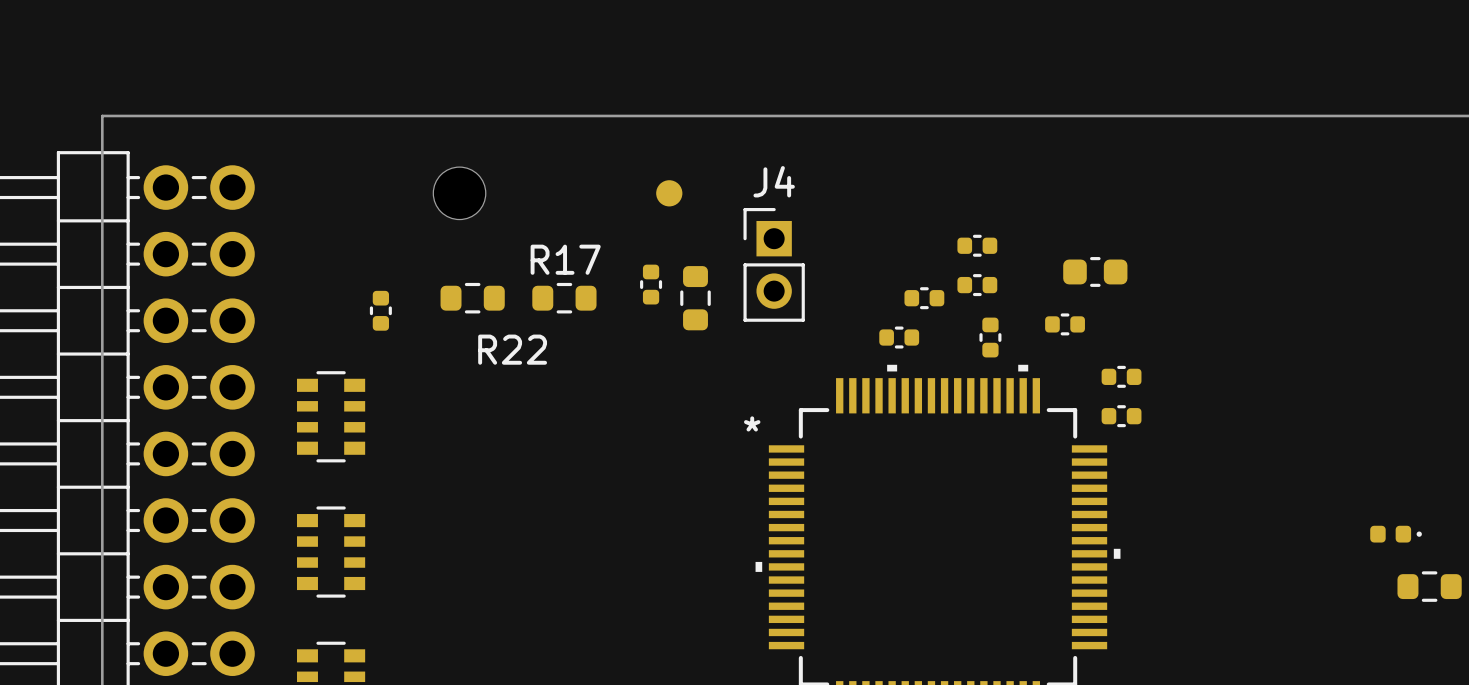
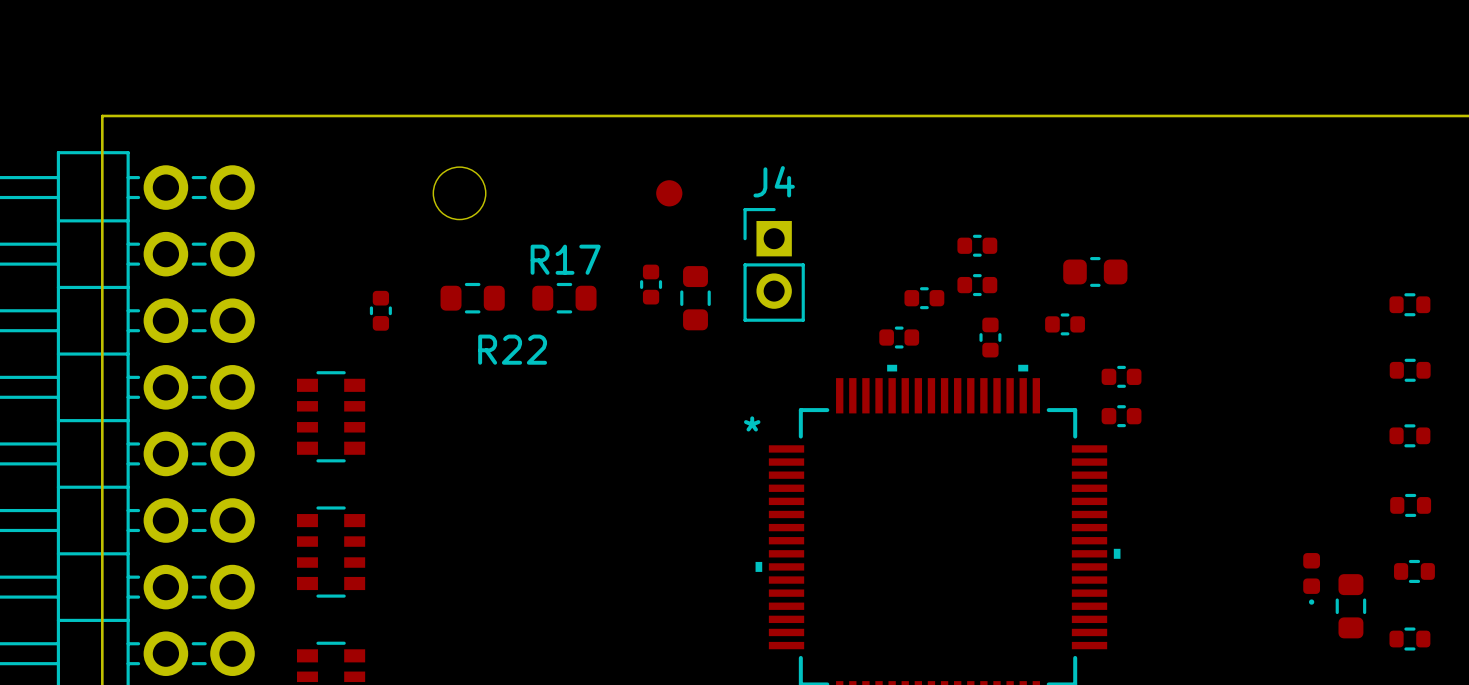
part: none -> (1409, 304)
part: none -> (1410, 370)
part: none -> (1409, 435)
part: none -> (1410, 505)
part rotation: 0° (1396, 534) -> 90° clockwise (1311, 578)
part position: (1396, 534) -> (1311, 578)
part: none -> (1414, 571)
part rotation: 0° (1429, 586) -> 90° clockwise (1350, 606)
part position: (1429, 586) -> (1350, 606)
part: none -> (1409, 639)

